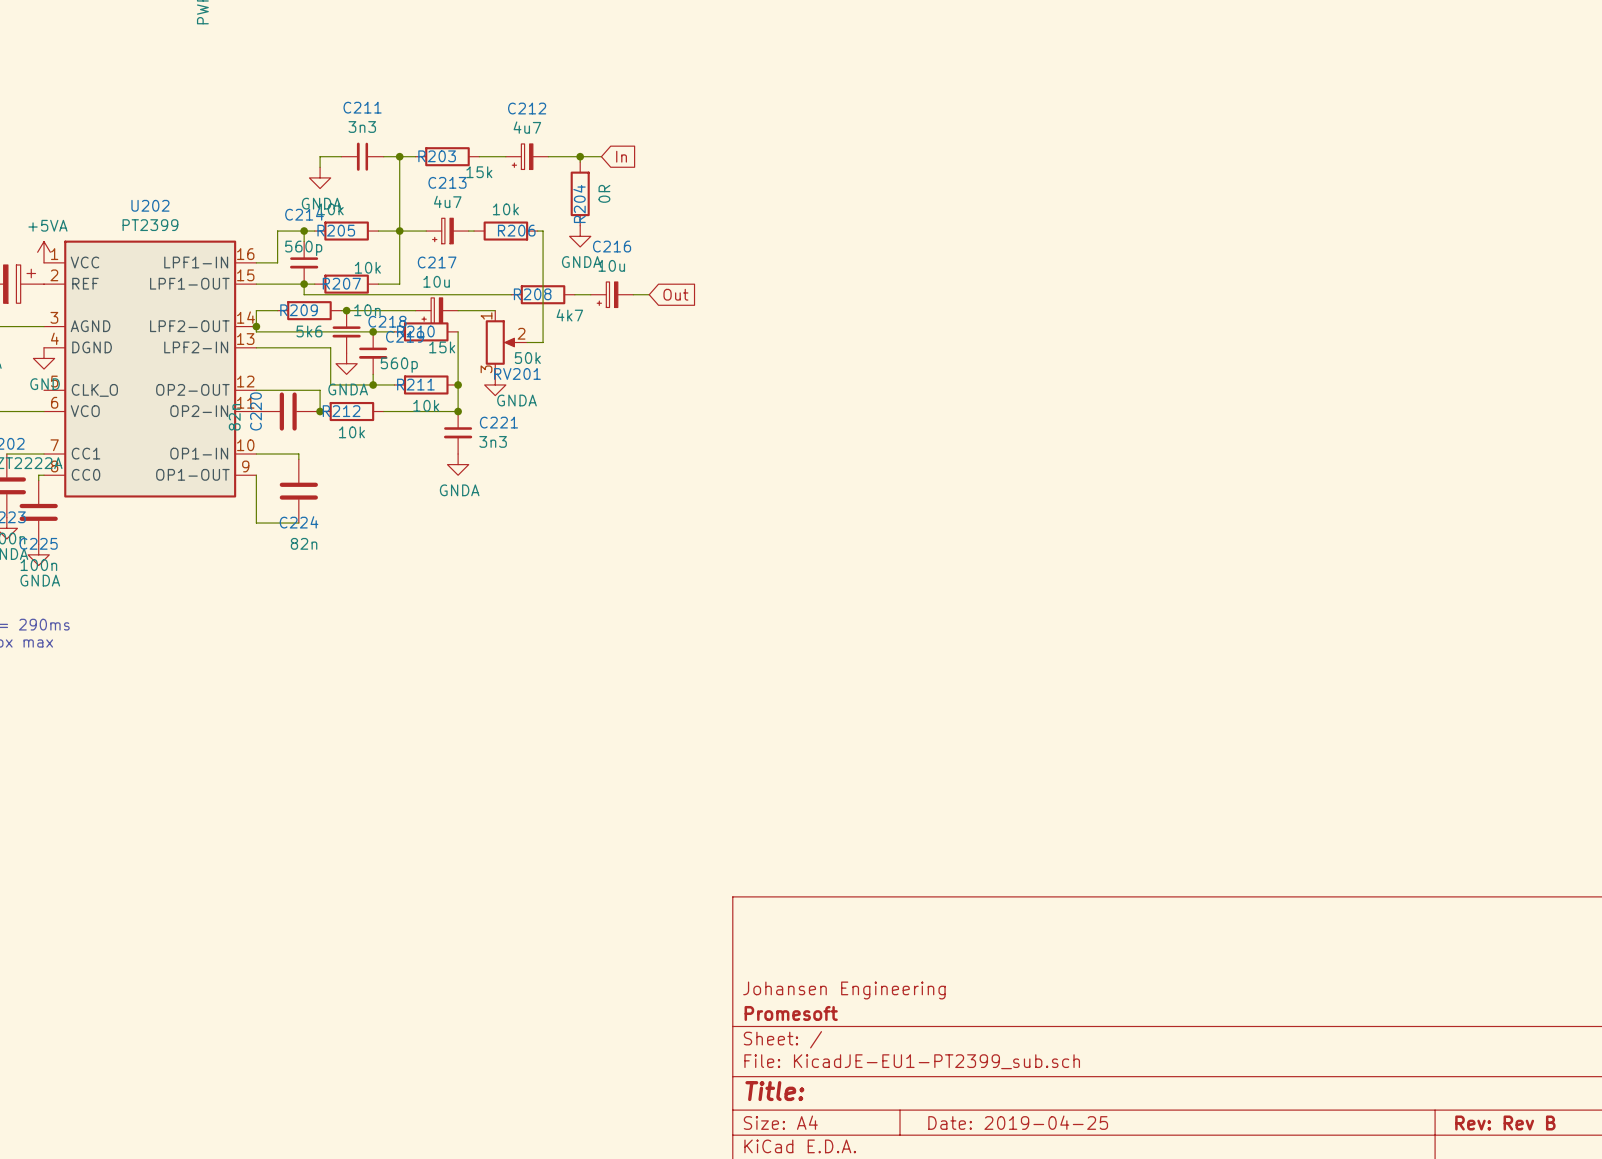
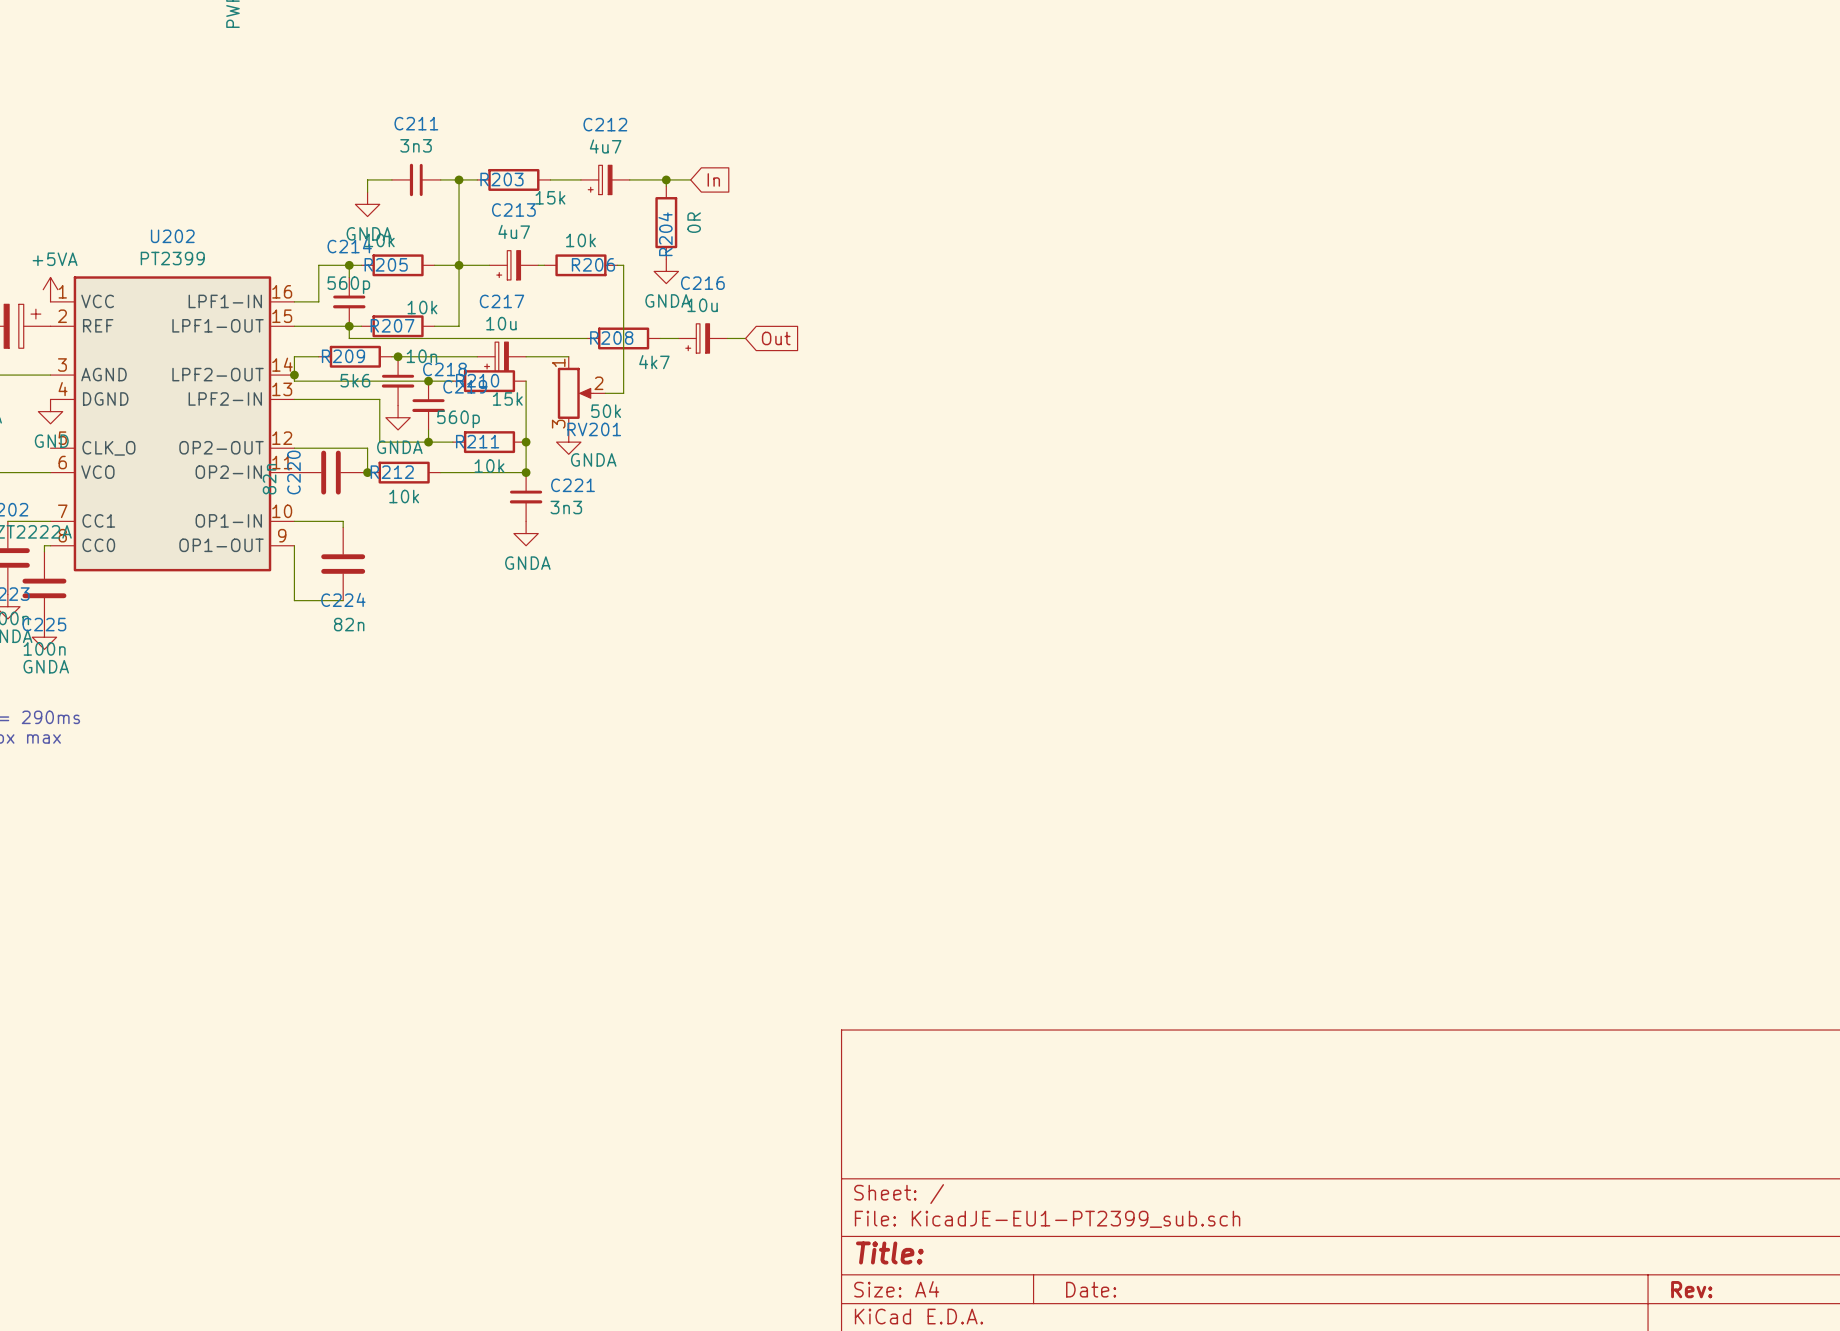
title block: Johansen Engineering (844, 990) -> none
title block: Promesoft (791, 1013) -> none
title block: Date: 2019-04-25 (1018, 1122) -> Date: (1091, 1289)
title block: Rev: Rev B (1505, 1123) -> Rev: (1691, 1289)

